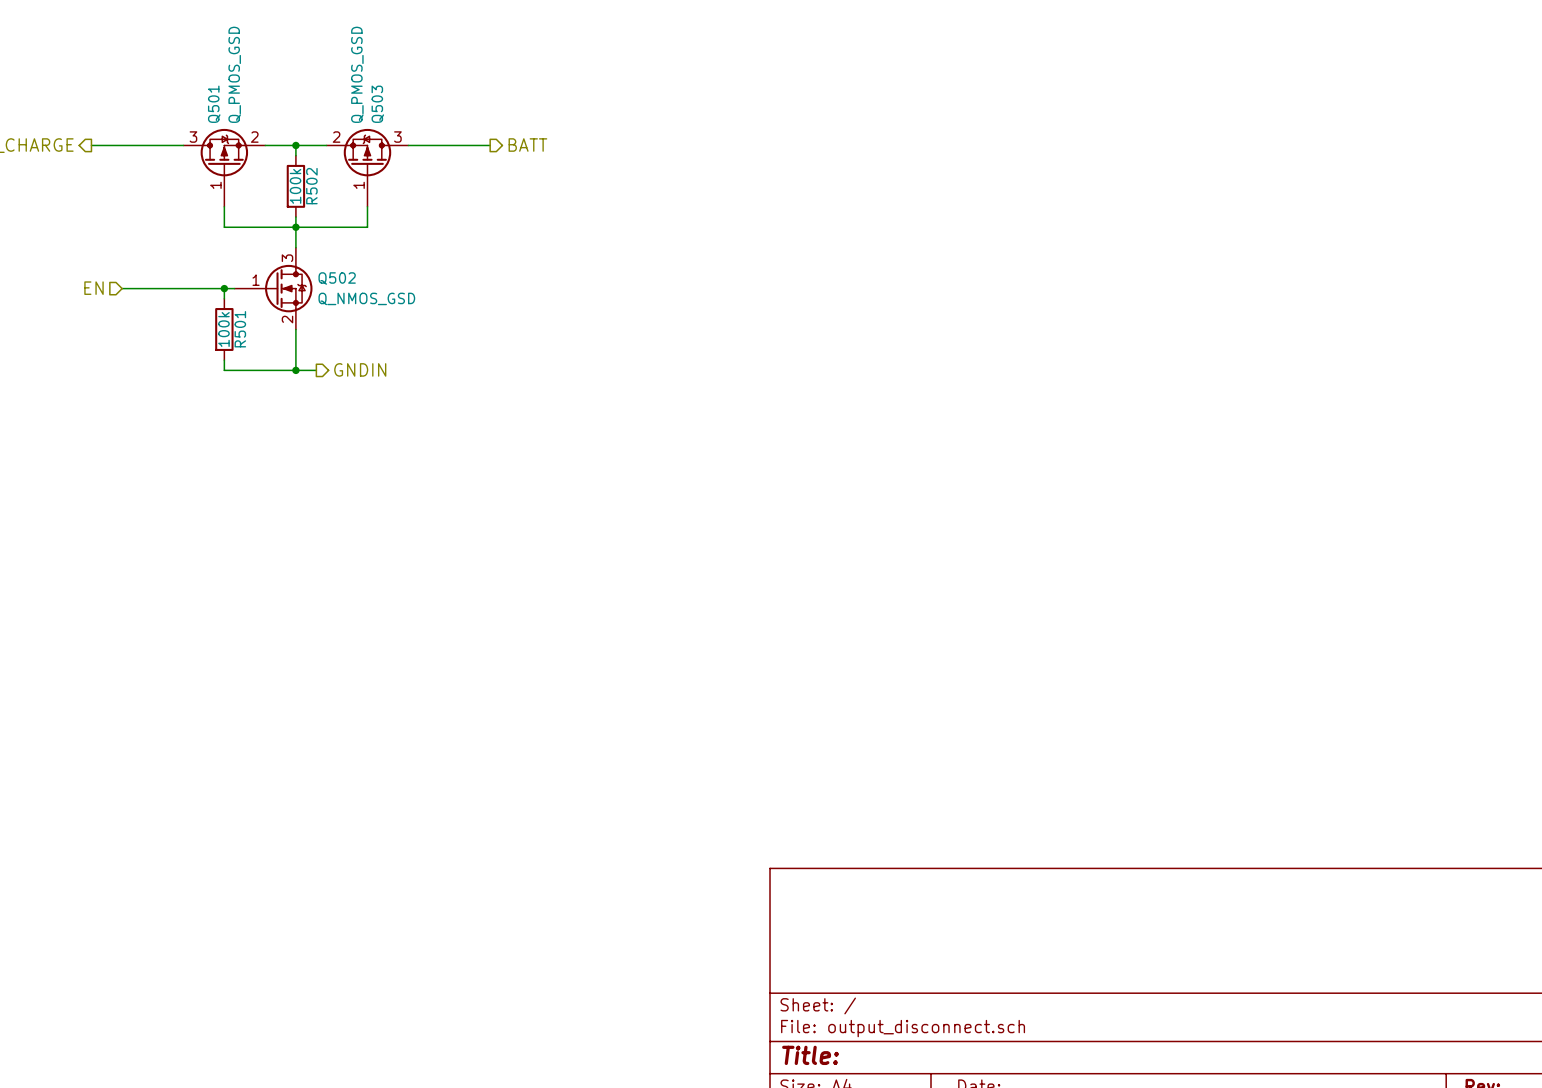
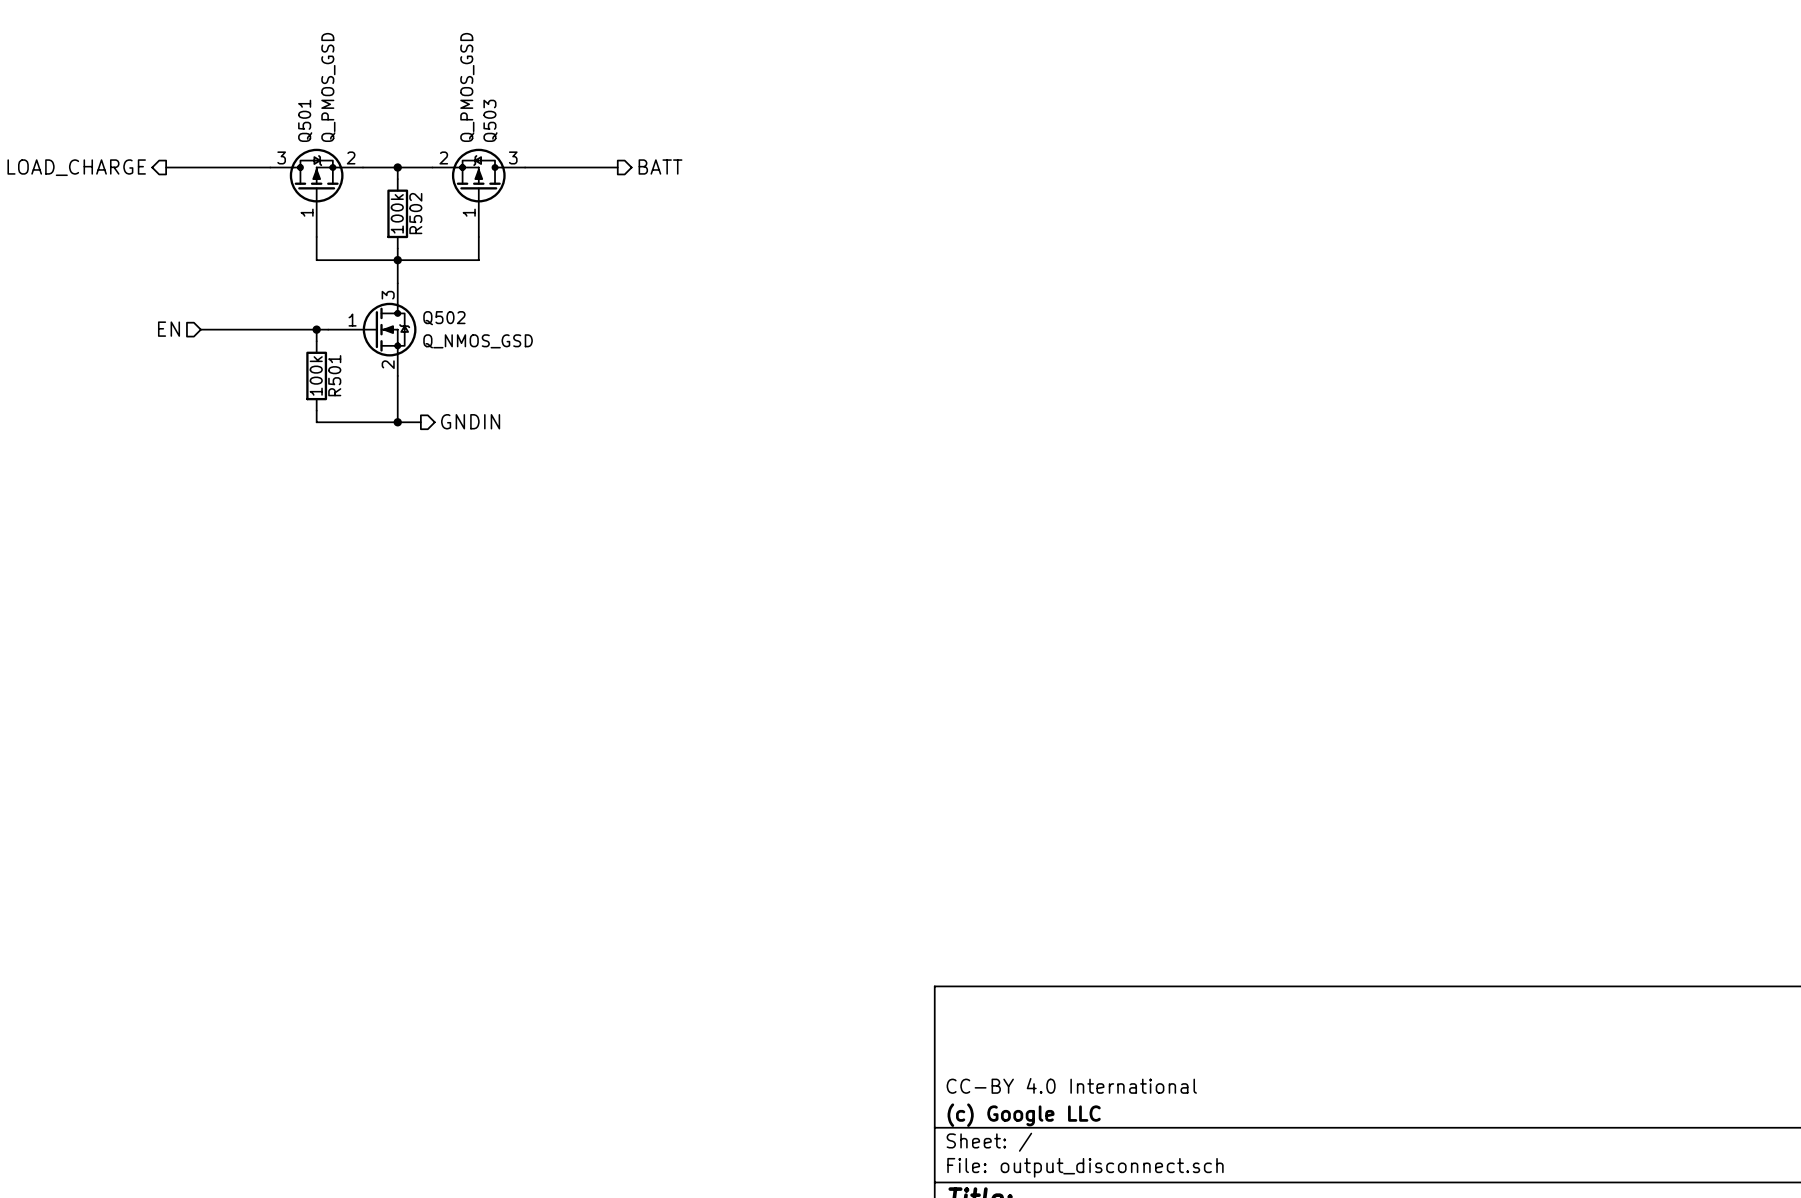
title block: none -> CC-BY 4.0 International (1071, 1085)
title block: none -> (c) Google LLC (1024, 1115)

